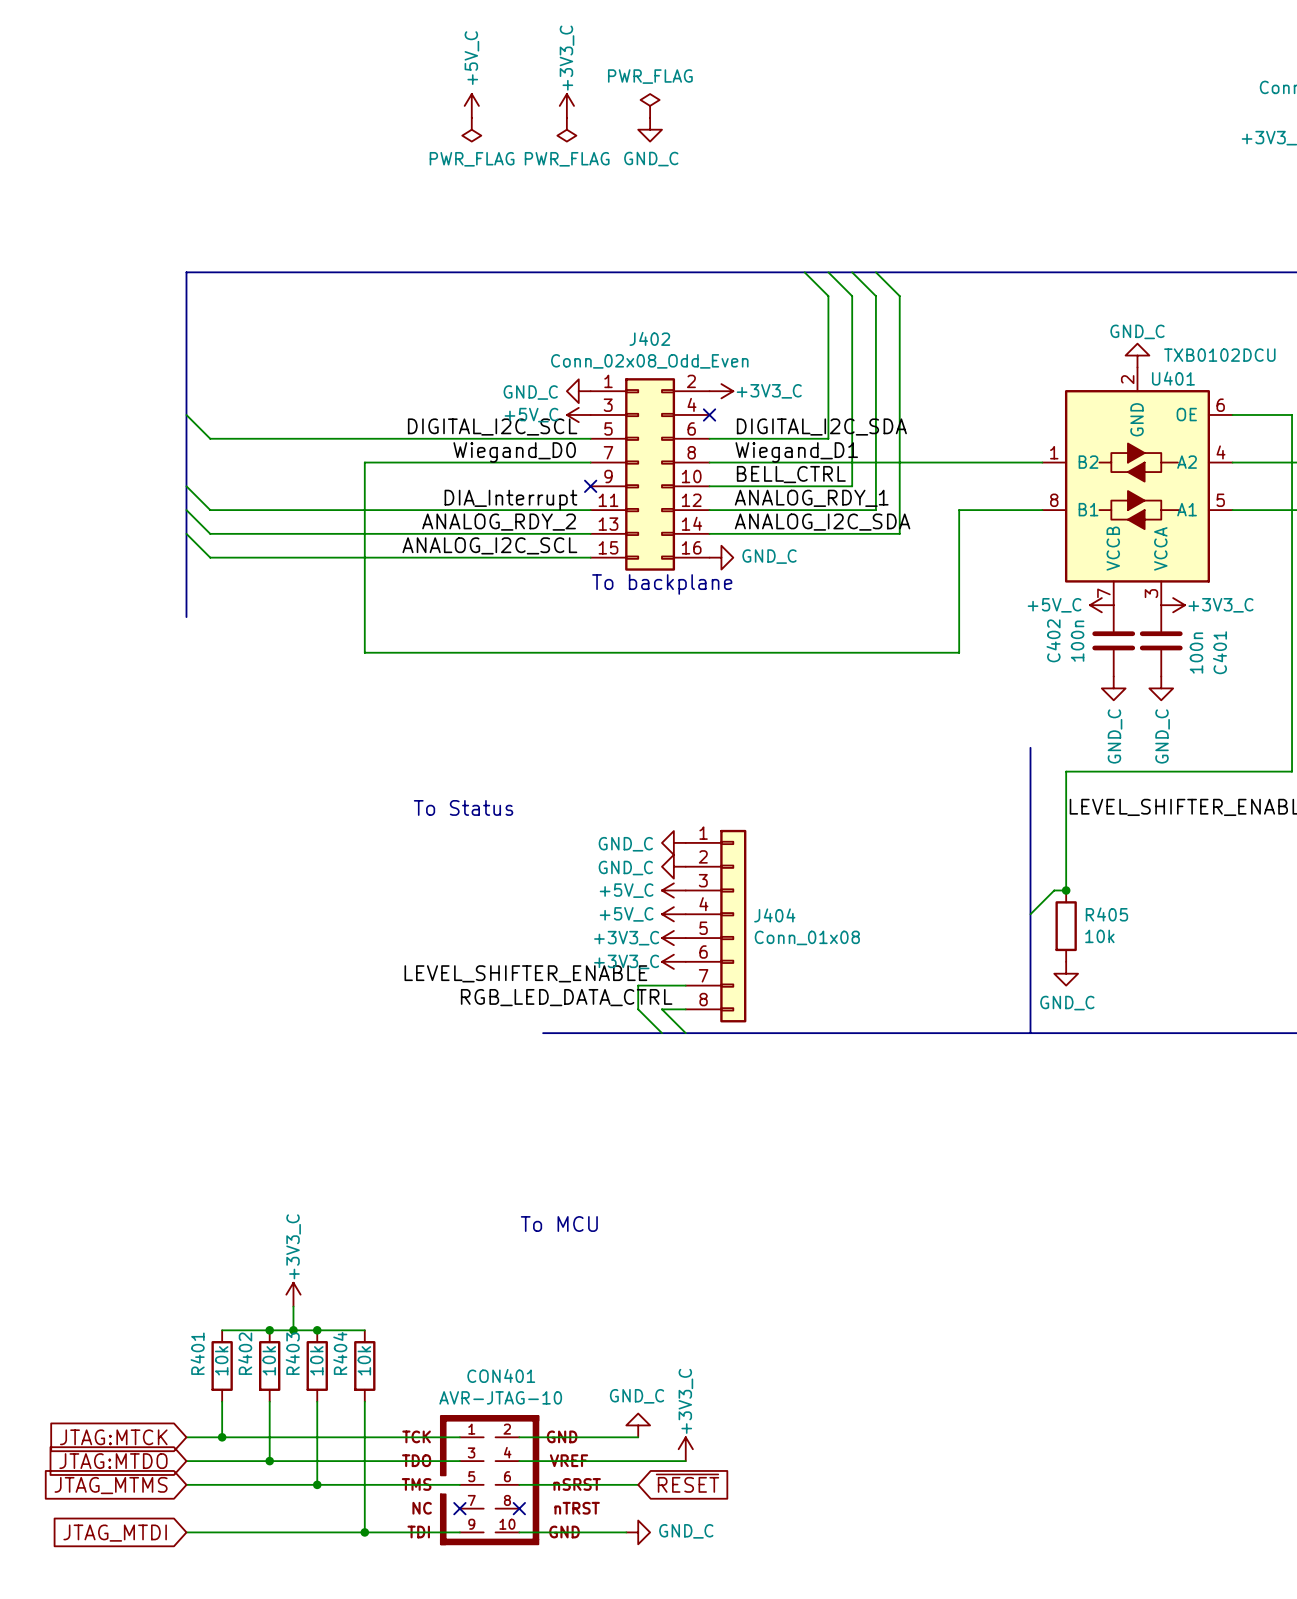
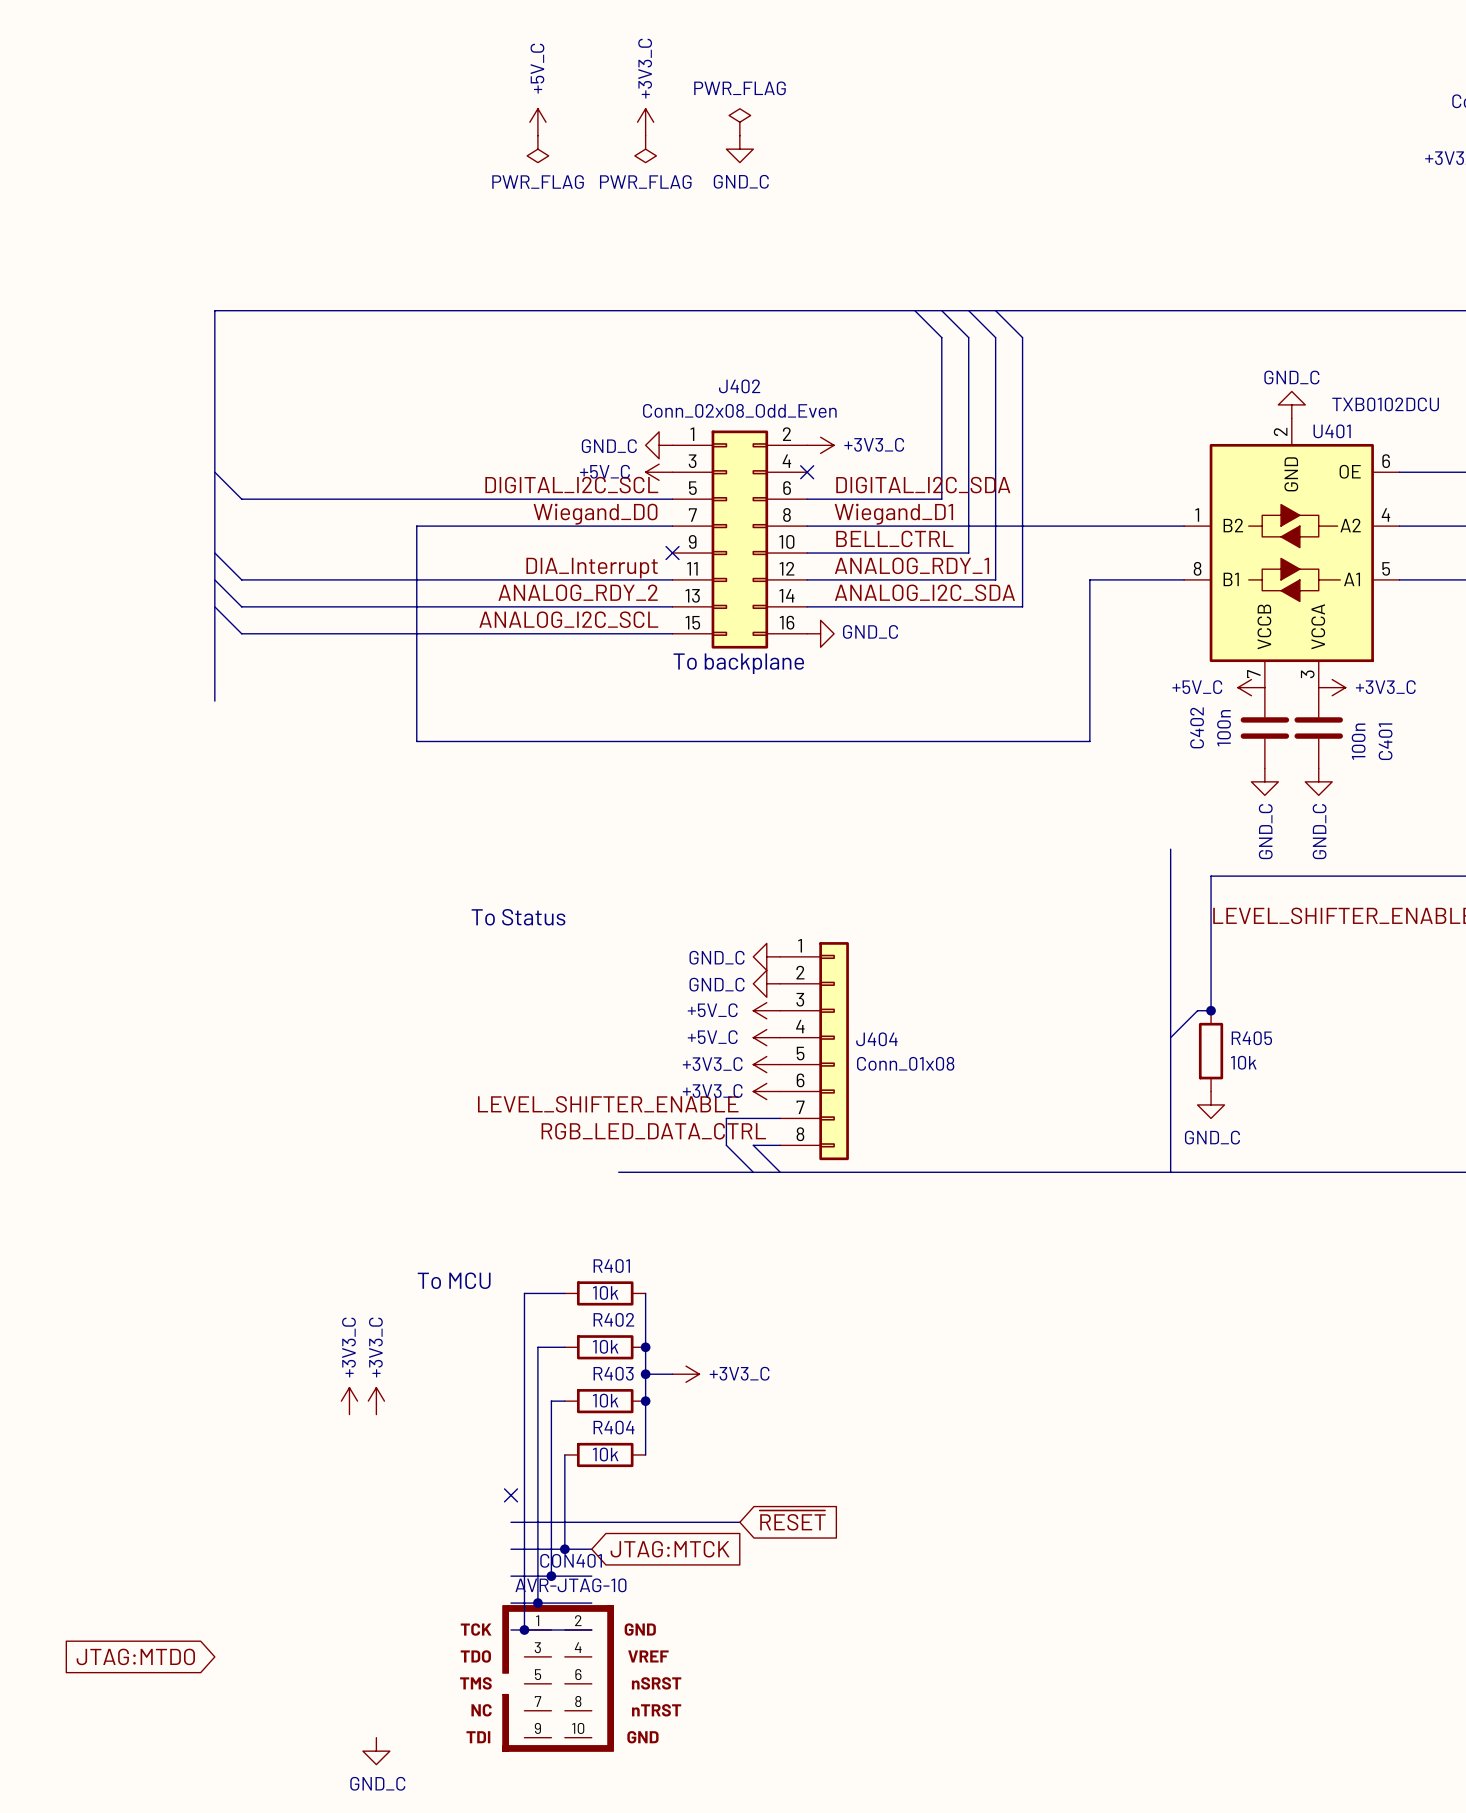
wire: none -> (645, 1293) (645, 1454)
wire: none -> (564, 1347) (537, 1347) (537, 1603)
junction: none -> (645, 1347)
wire: none -> (645, 1374) (672, 1374)
junction: none -> (645, 1374)
power symbol: none -> +3V3_C (686, 1374)
text position: To MCU (559, 1224) -> To MCU (454, 1280)
power symbol: none -> +3V3_C (349, 1401)
power symbol: none -> +3V3_C (376, 1401)
wire: none -> (564, 1401) (551, 1401) (551, 1576)
junction: none -> (645, 1401)
power symbol: +3V3_C (293, 1294) -> none
wire: (293, 1306) (293, 1330) -> none
no-connect mark: none -> (511, 1495)
wire: (222, 1330) (364, 1330) -> none
junction: (269, 1330) -> none
junction: (293, 1330) -> none
junction: (317, 1330) -> none
wire: none -> (511, 1522) (739, 1522)
R401 rotation: 0° (222, 1365) -> 90° clockwise (605, 1293)
R401 position: (222, 1365) -> (605, 1293)
R402 rotation: 0° (269, 1365) -> 90° clockwise (605, 1347)
R402 position: (269, 1365) -> (605, 1347)
R403 rotation: 0° (317, 1365) -> 90° clockwise (605, 1401)
R403 position: (317, 1365) -> (605, 1401)
R404 rotation: 0° (364, 1365) -> 90° clockwise (605, 1454)
R404 position: (364, 1365) -> (605, 1454)
wire: none -> (511, 1549) (591, 1549)
junction: none -> (564, 1549)
global label: none -> JTAG:MTCK (670, 1549)
wire: none -> (511, 1576) (591, 1576)
junction: none -> (551, 1576)
wire: (222, 1401) (222, 1437) -> none
wire: (269, 1401) (269, 1461) -> none
wire: (317, 1401) (317, 1484) -> (564, 1454) (564, 1549)
wire: (364, 1401) (364, 1532) -> none
wire: none -> (511, 1603) (591, 1603)
junction: none -> (537, 1603)
power symbol: GND_C (638, 1425) -> none
global label: JTAG:MTCK (113, 1437) -> none
wire: (186, 1437) (448, 1437) -> none
junction: (222, 1437) -> none
junction: none -> (524, 1629)
wire: (519, 1437) (638, 1437) -> (591, 1629) (524, 1629) (524, 1293) (564, 1293)
power symbol: +3V3_C (685, 1449) -> none
wire: (186, 1461) (459, 1461) -> none
junction: (269, 1461) -> none
wire: (519, 1461) (685, 1461) -> none
global label position: ~{RESET} (687, 1483) -> ~{RESET} (792, 1520)
wire: (186, 1484) (459, 1484) -> none
junction: (317, 1484) -> none
wire: (519, 1484) (638, 1484) -> none
global label: JTAG_MTMS (111, 1485) -> none
no-connect mark: (459, 1508) -> none
no-connect mark: (519, 1508) -> none
wire: (186, 1532) (459, 1532) -> none
junction: (364, 1532) -> none
wire: (519, 1532) (626, 1532) -> none
power symbol: GND_C (638, 1532) -> none
global label: JTAG_MTDI (115, 1533) -> none
power symbol: none -> GND_C (376, 1751)

